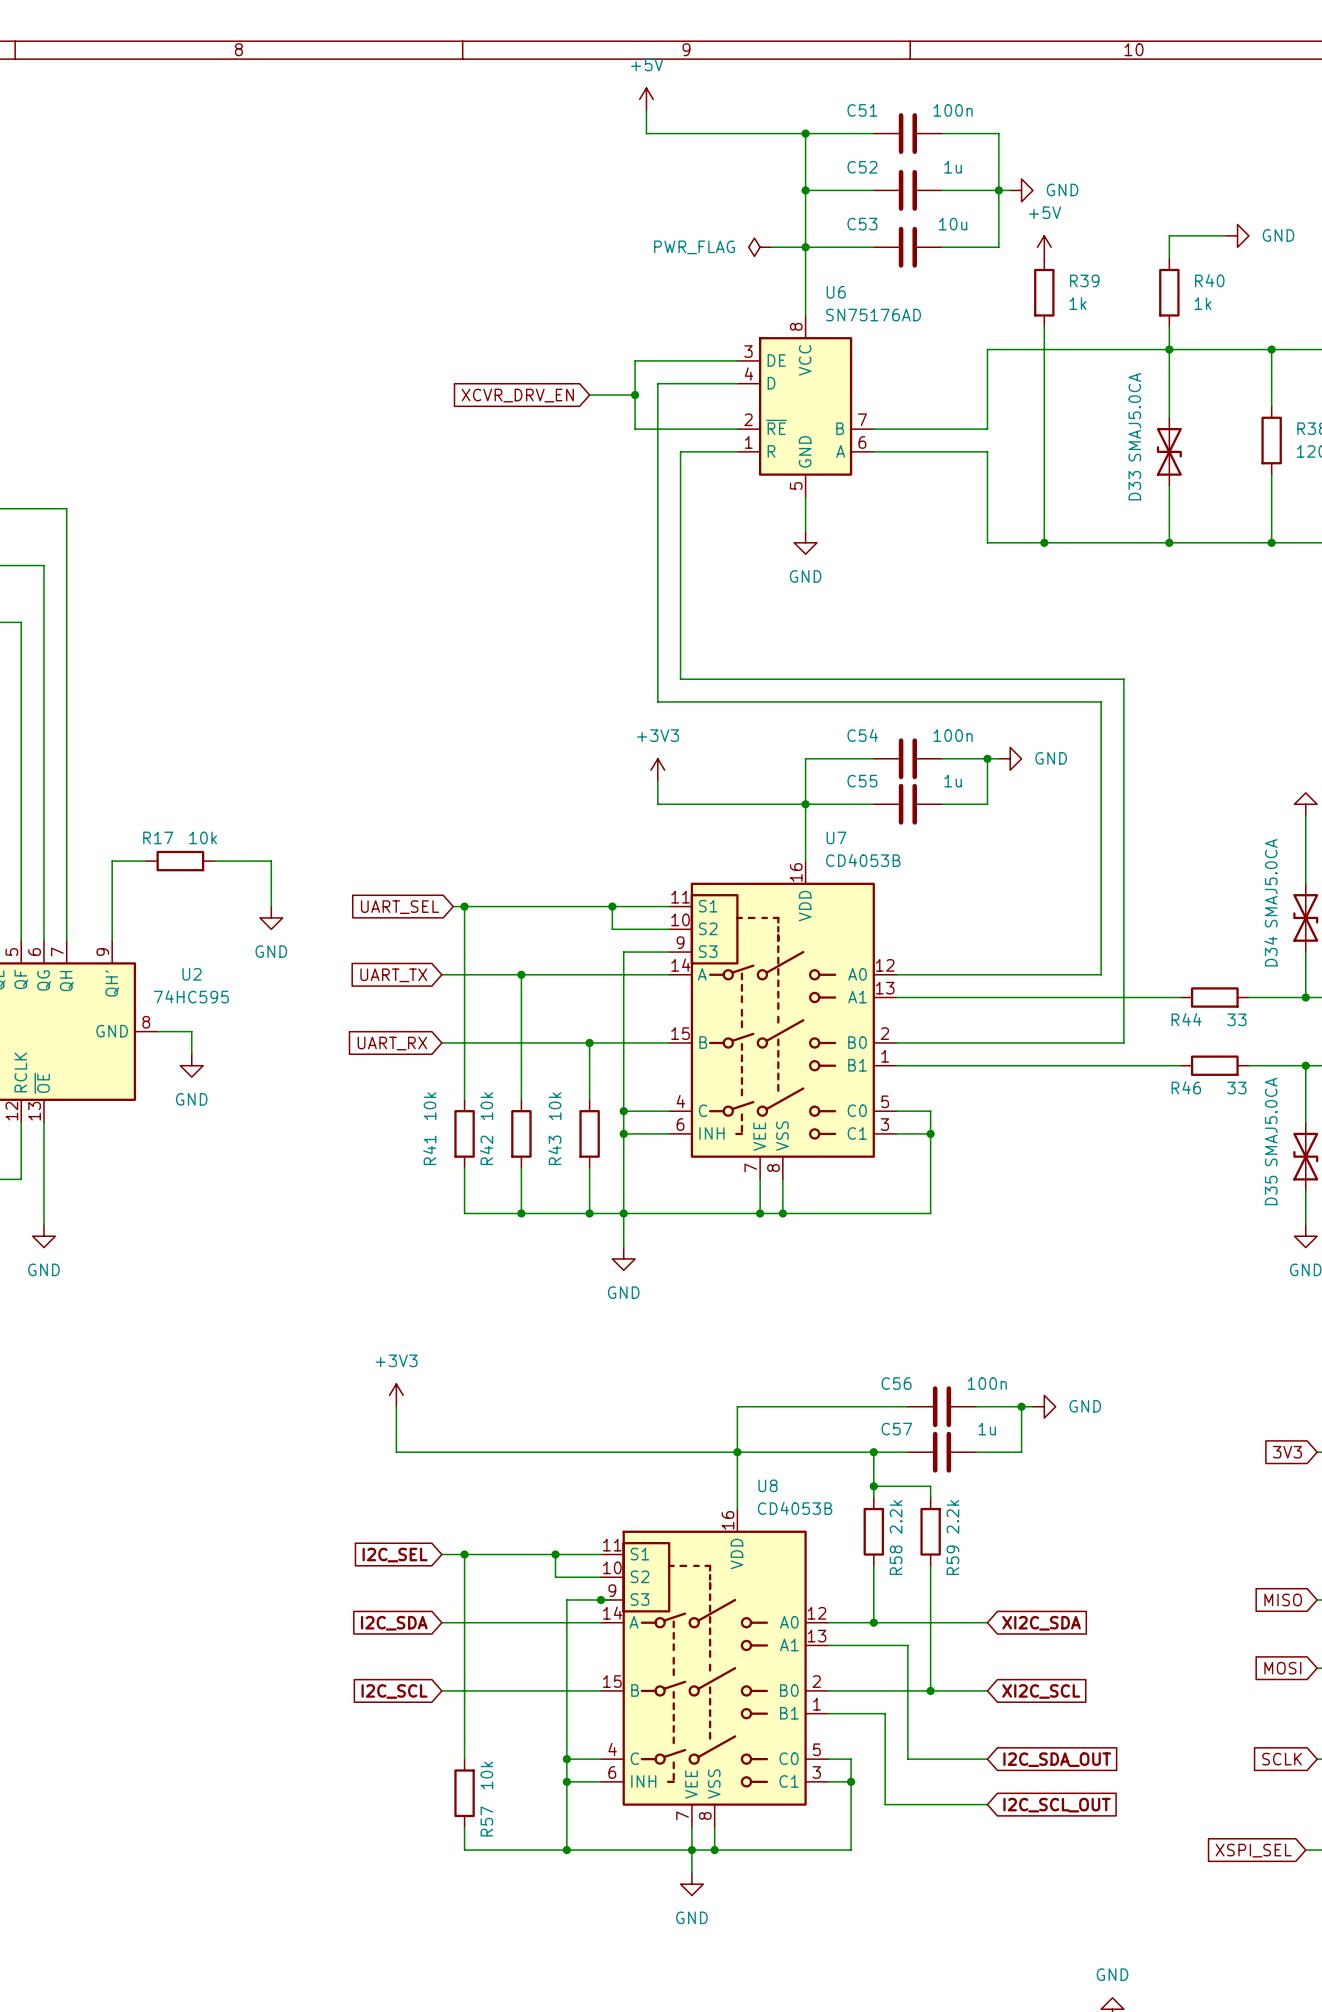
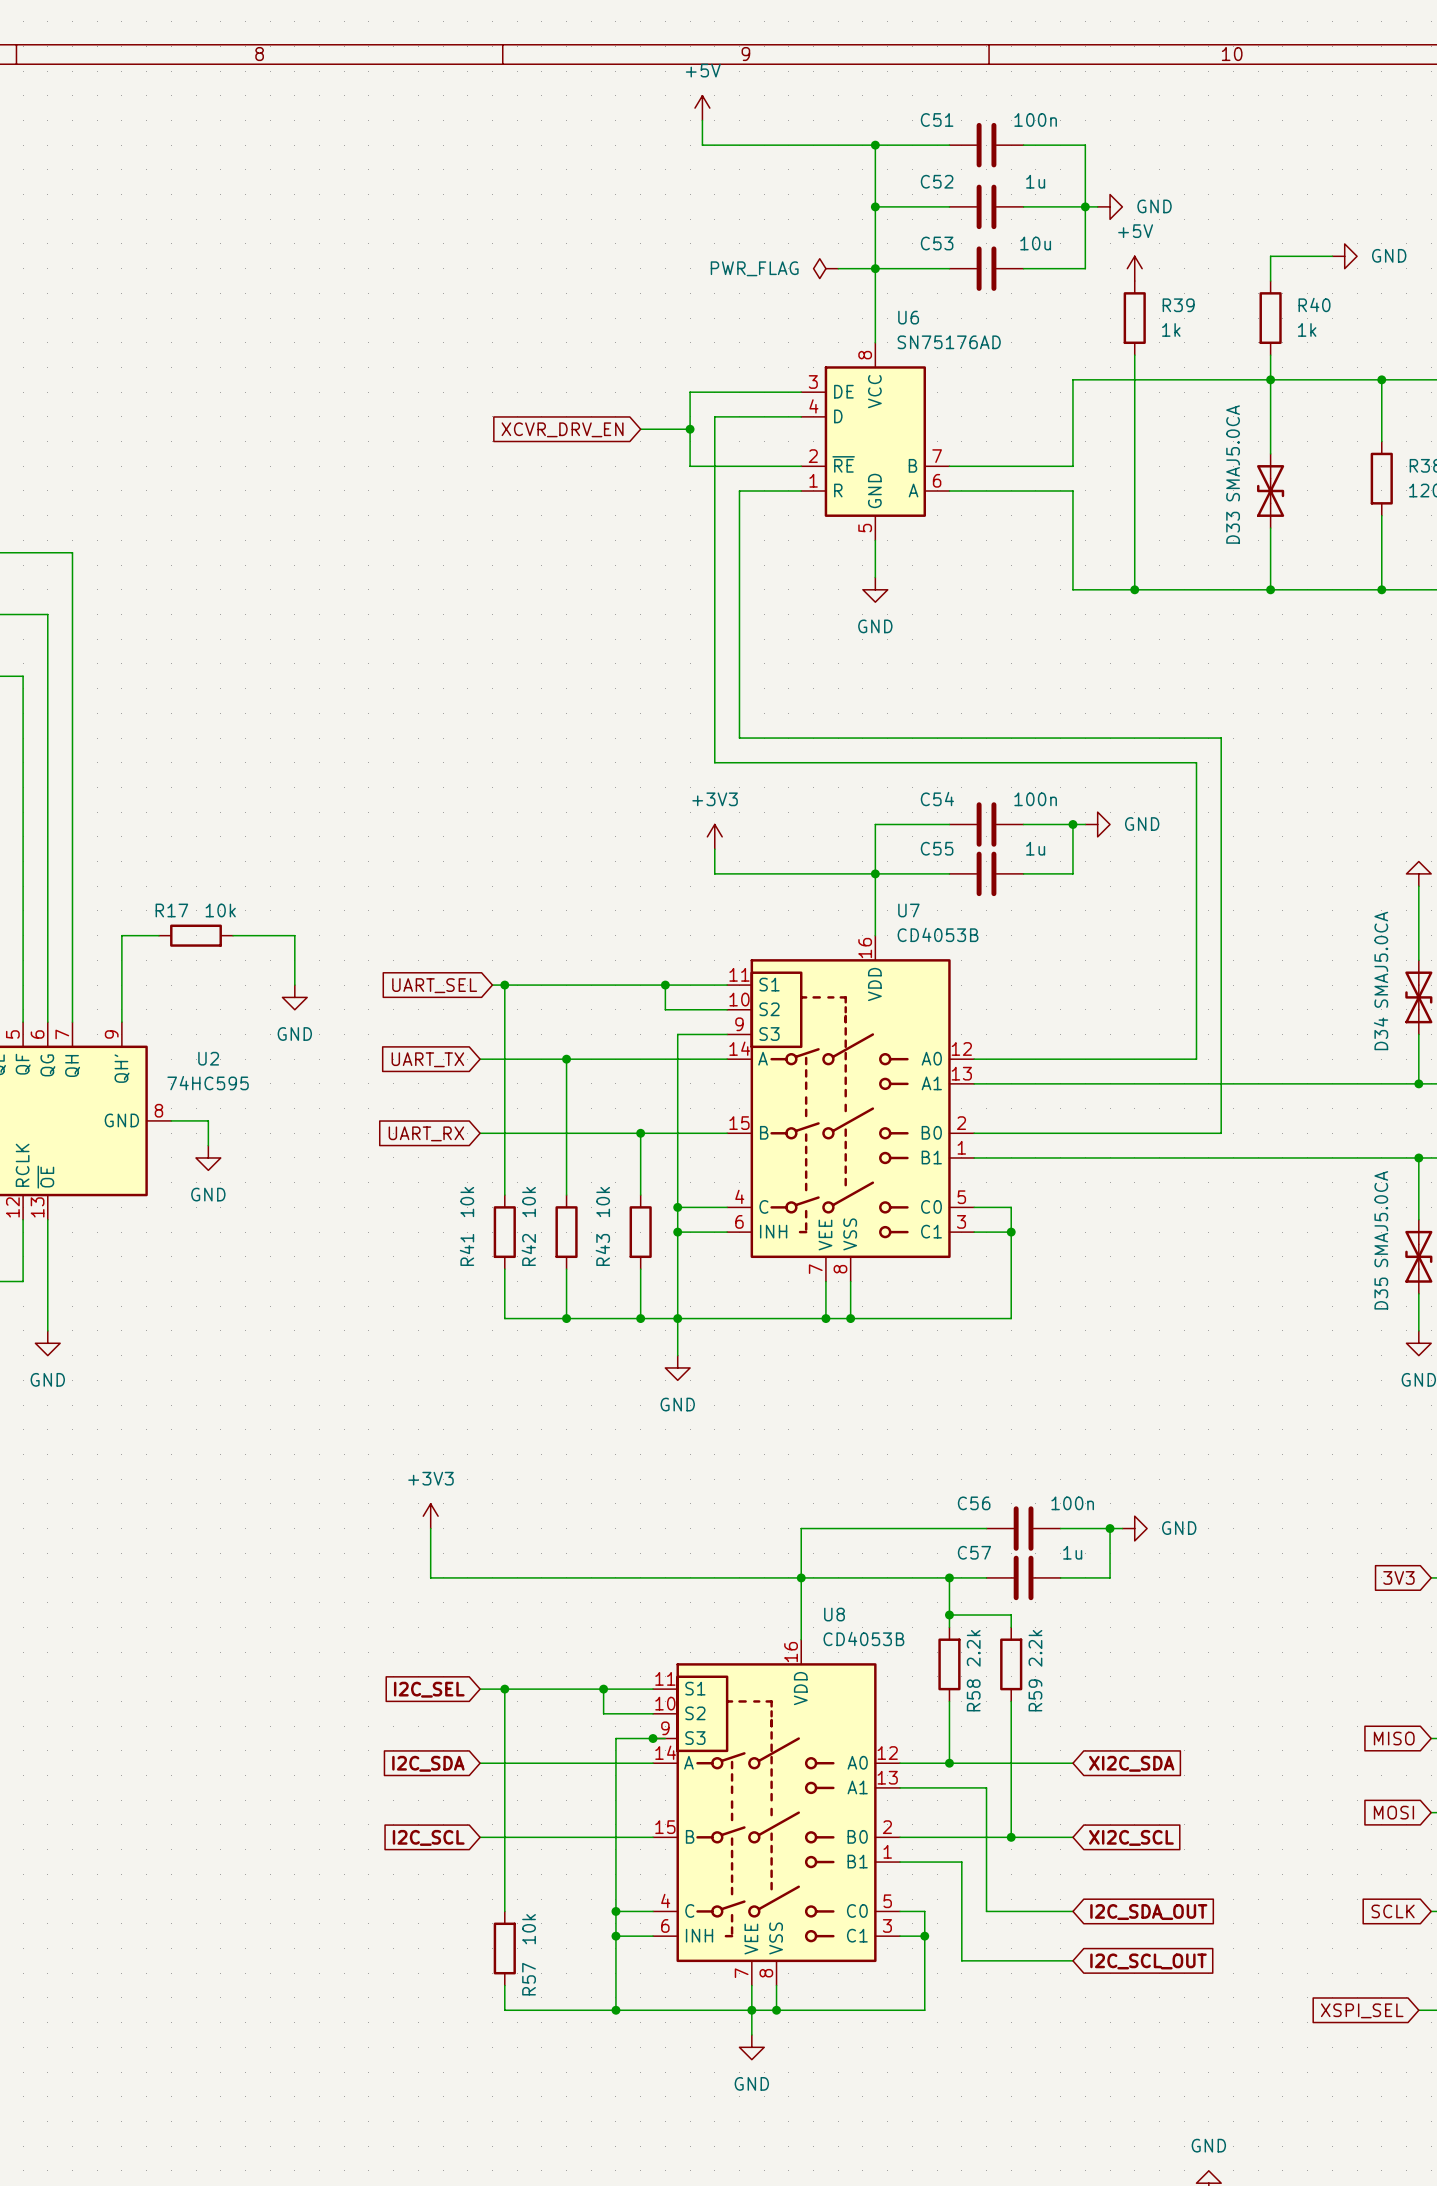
wire: none -> (1282, 1083) (1357, 1083)
R44: 33 (1214, 997) -> none
wire: none -> (1282, 1157) (1357, 1157)
R46: 33 (1214, 1065) -> none

